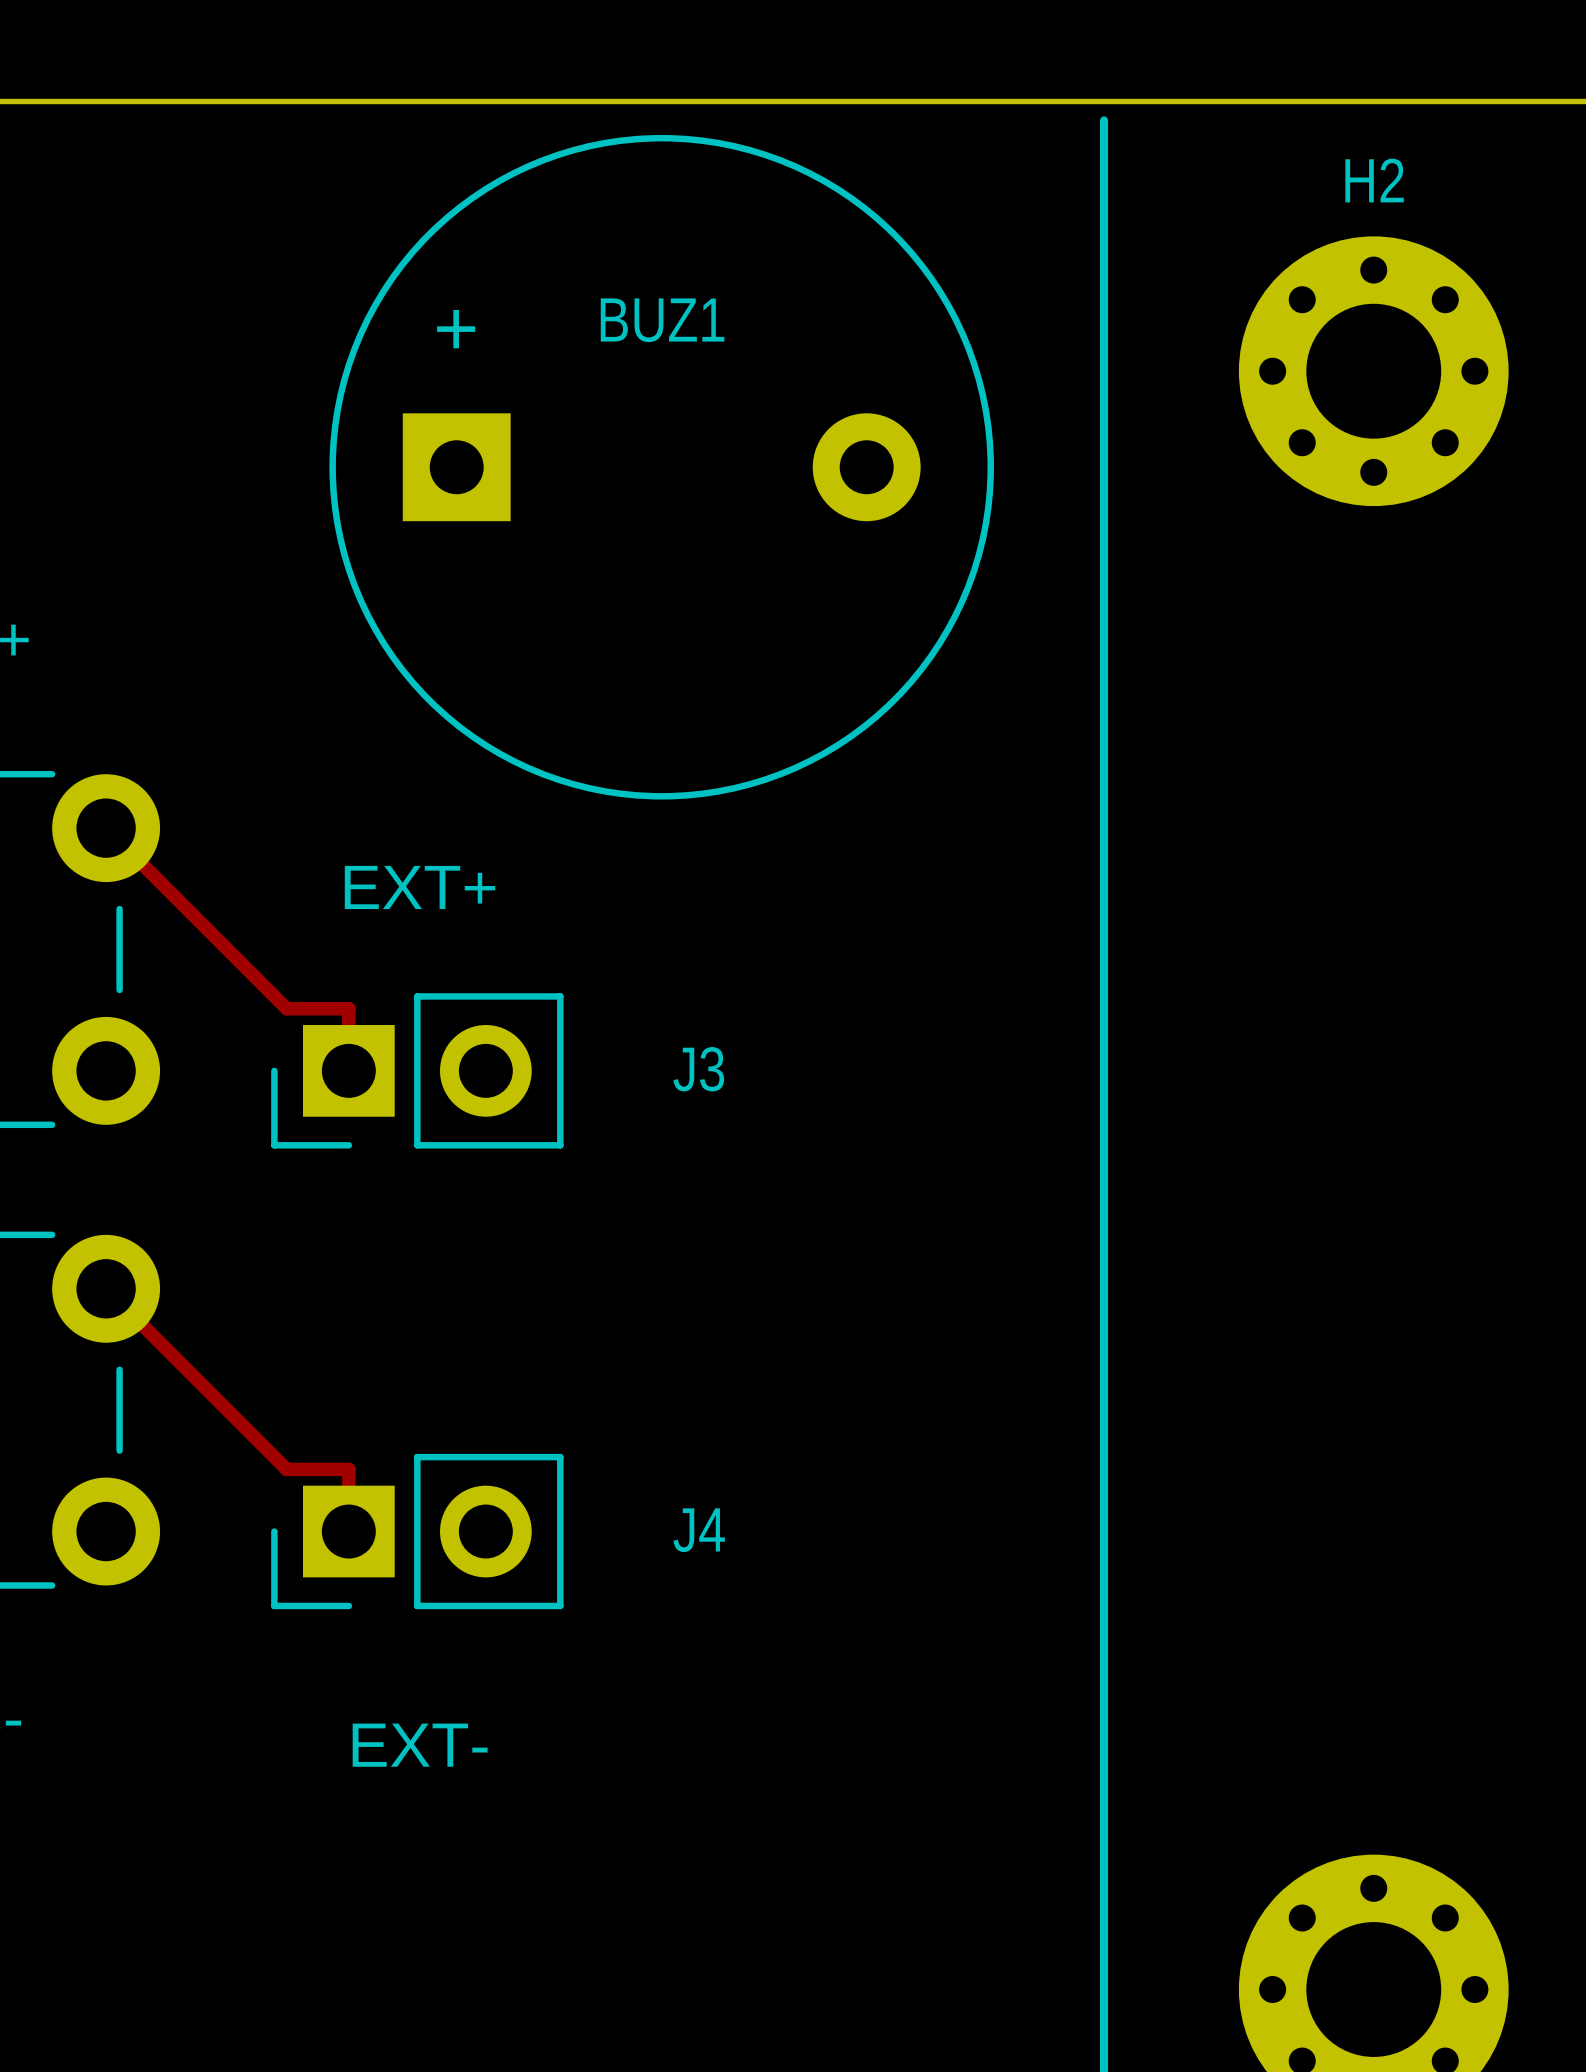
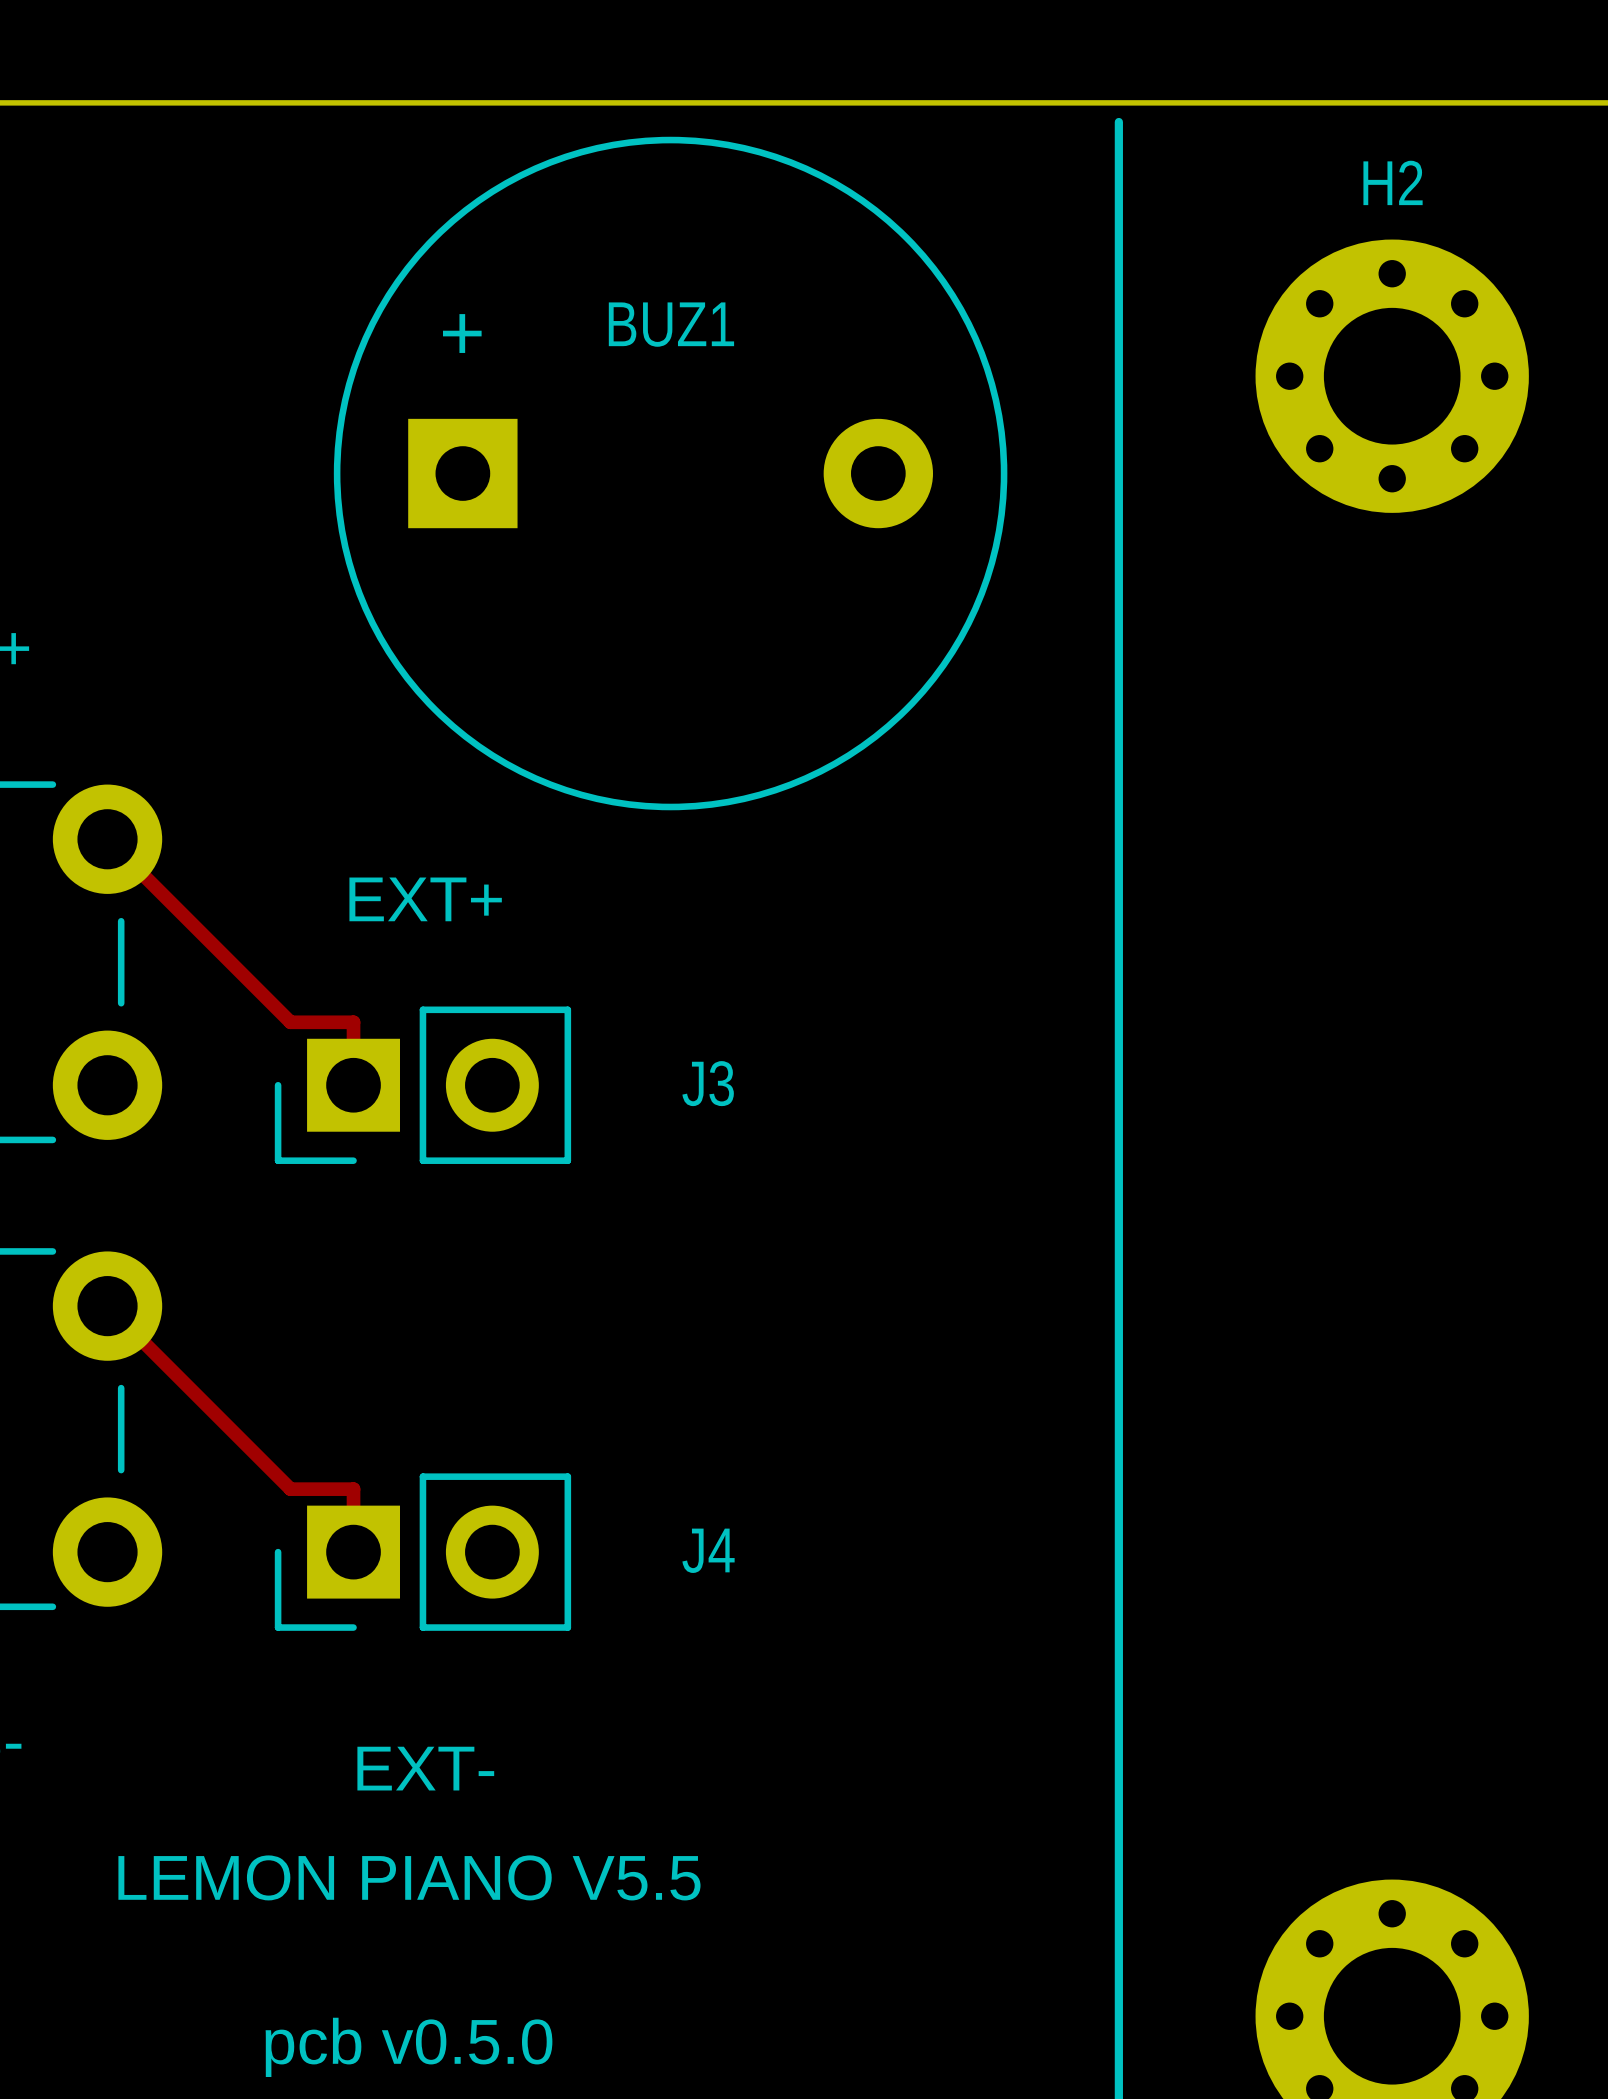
text: none -> LEMON PIANO V5.5 (409, 1877)
text: none -> pcb v0.5.0 (409, 2047)

